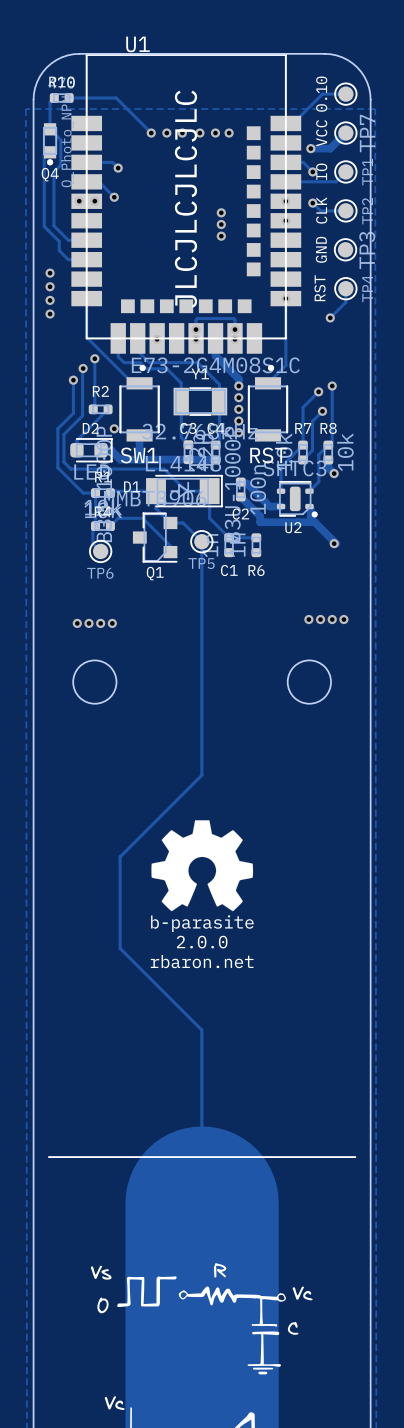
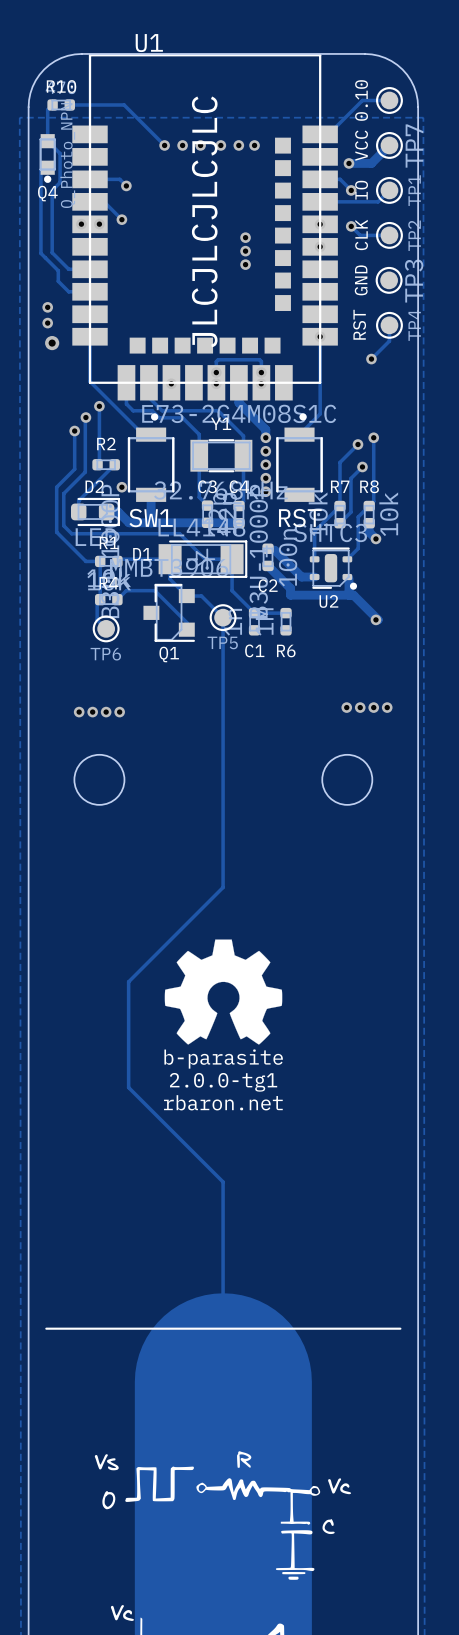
via: (50, 300) -> none
via: none -> (52, 343)
via: (50, 314) -> none
text: 2.0.0 (202, 942) -> 2.0.0-tg1 (223, 1082)

